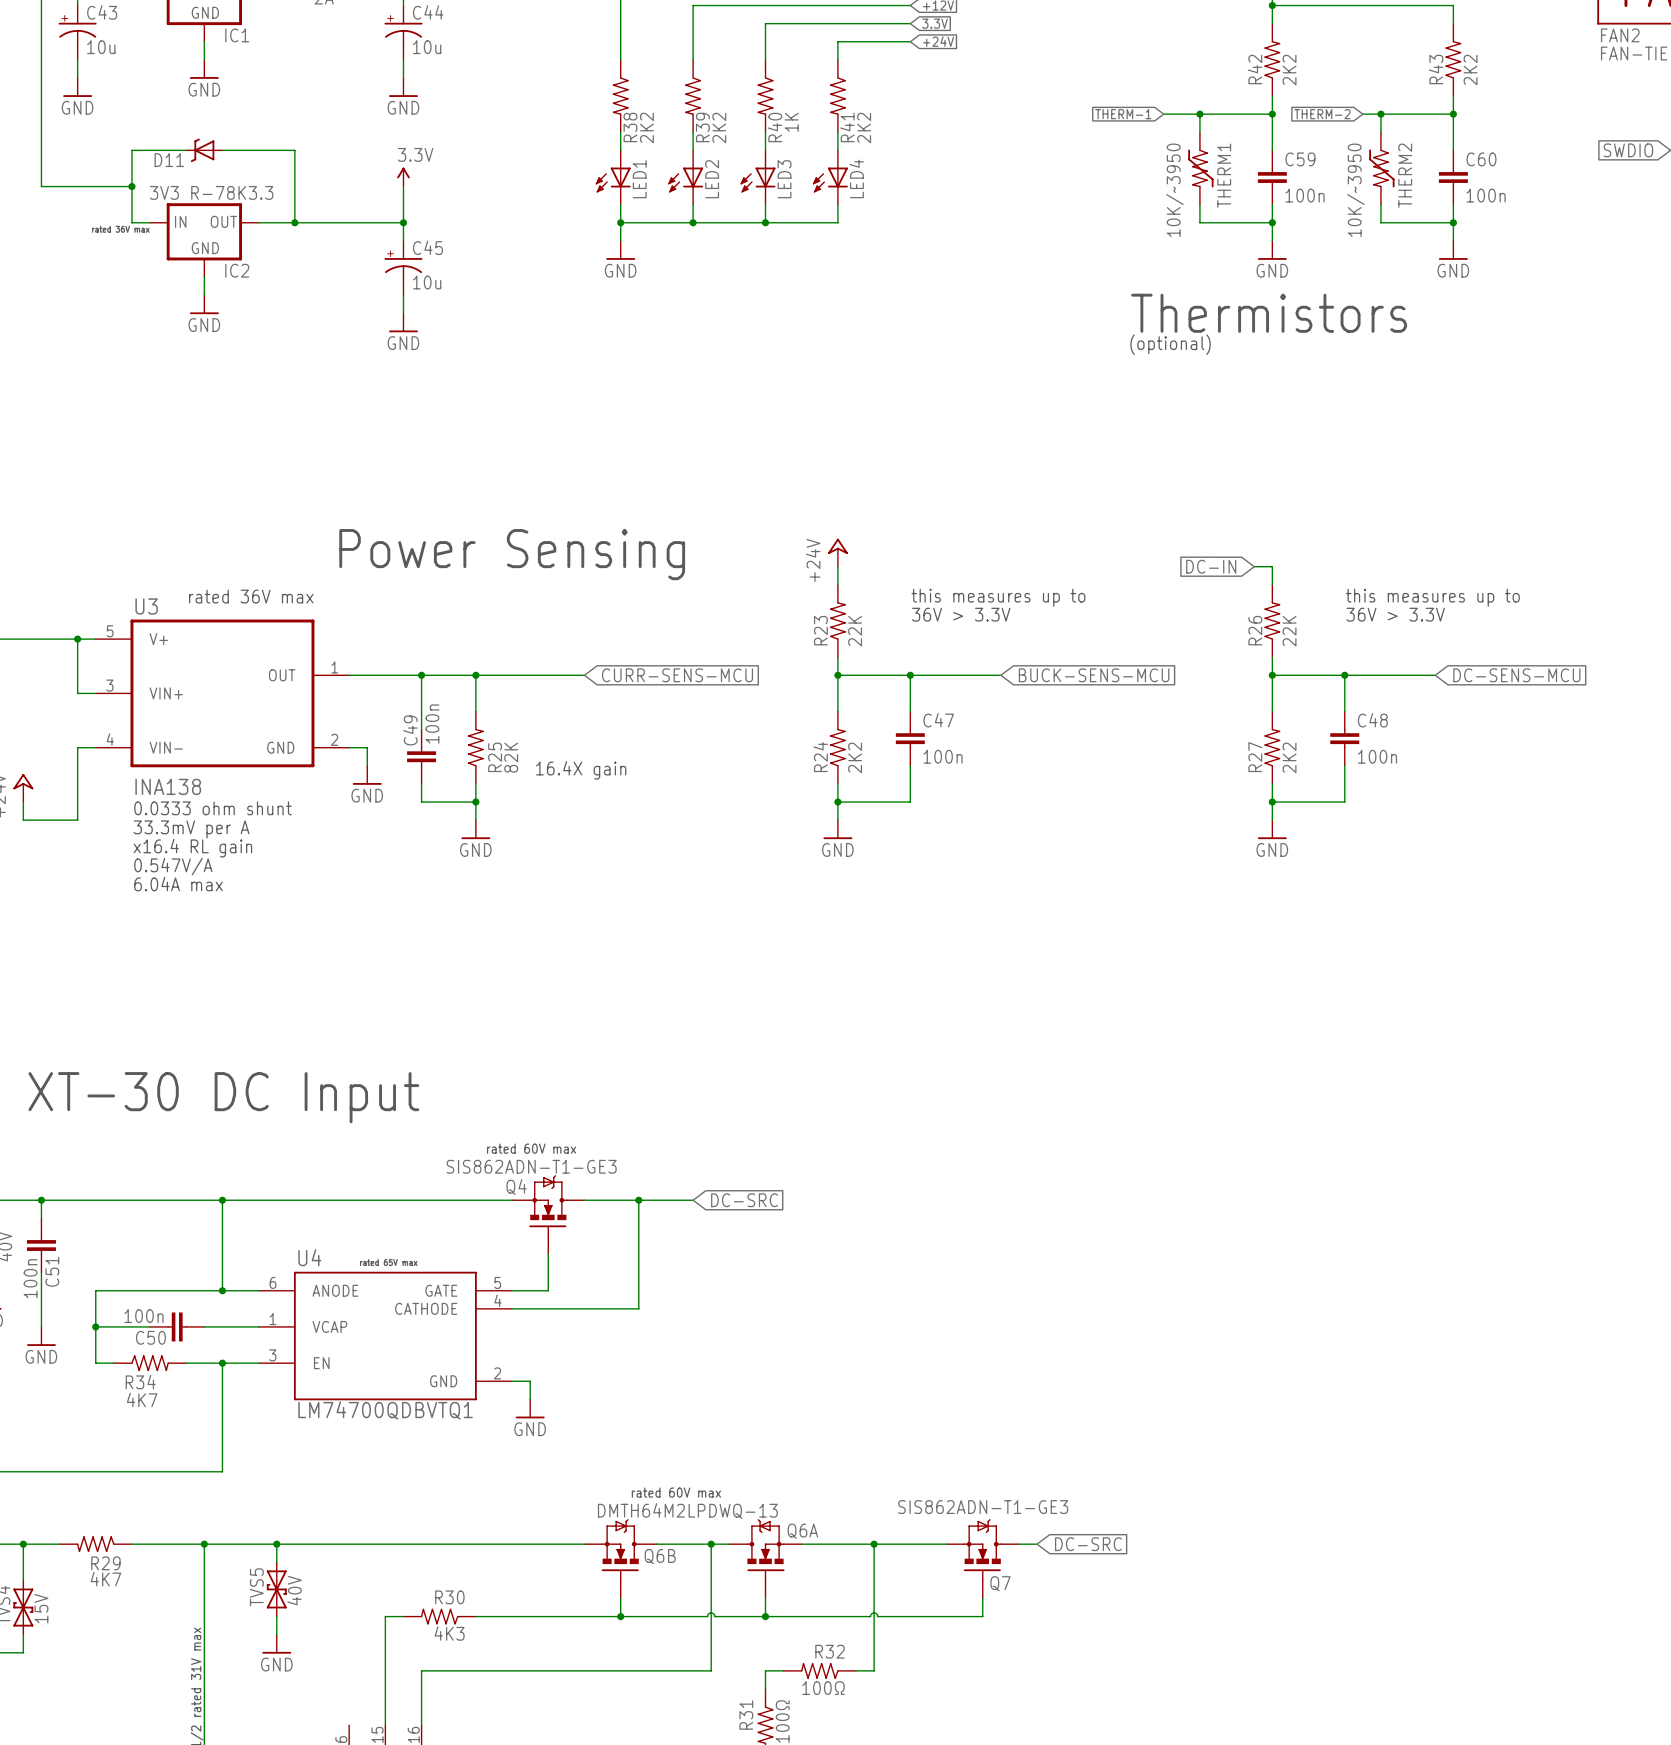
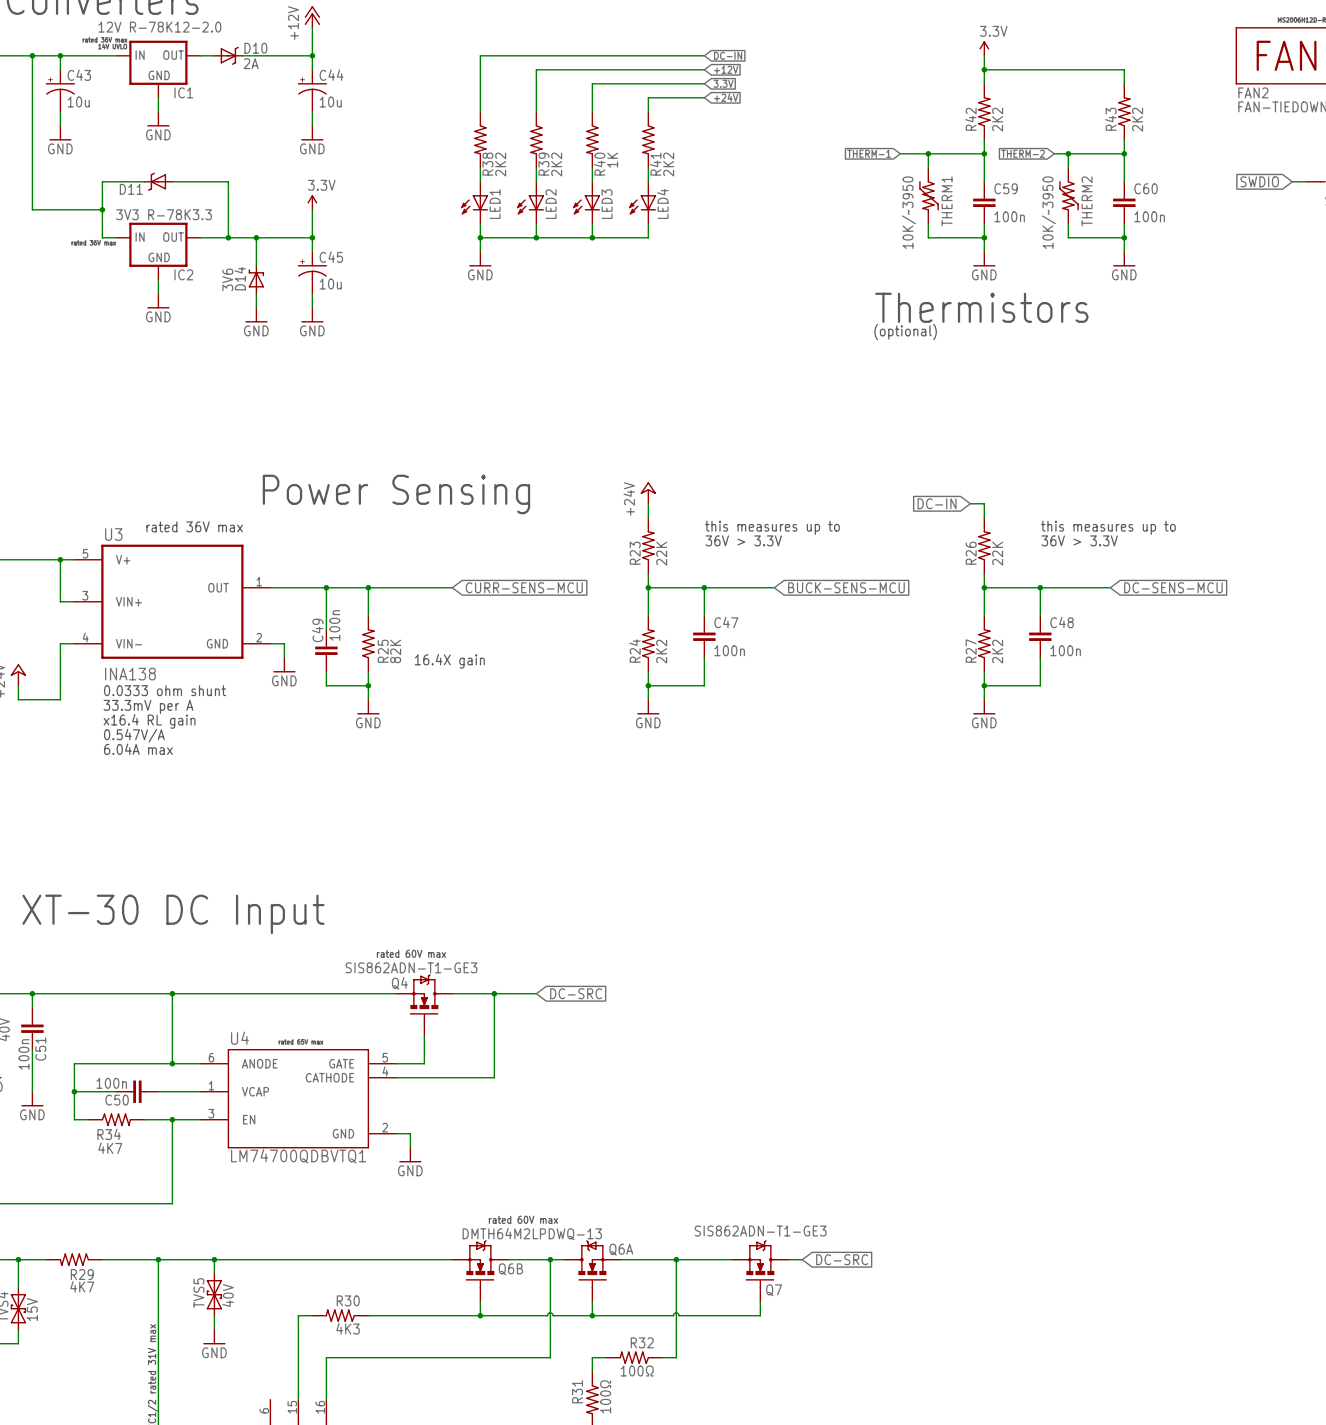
wire: none -> (256, 237) (256, 265)
junction: none -> (256, 237)
D14: none -> 3V6 (256, 279)
wire: none -> (256, 293) (256, 307)
power symbol: none -> GND (256, 315)

